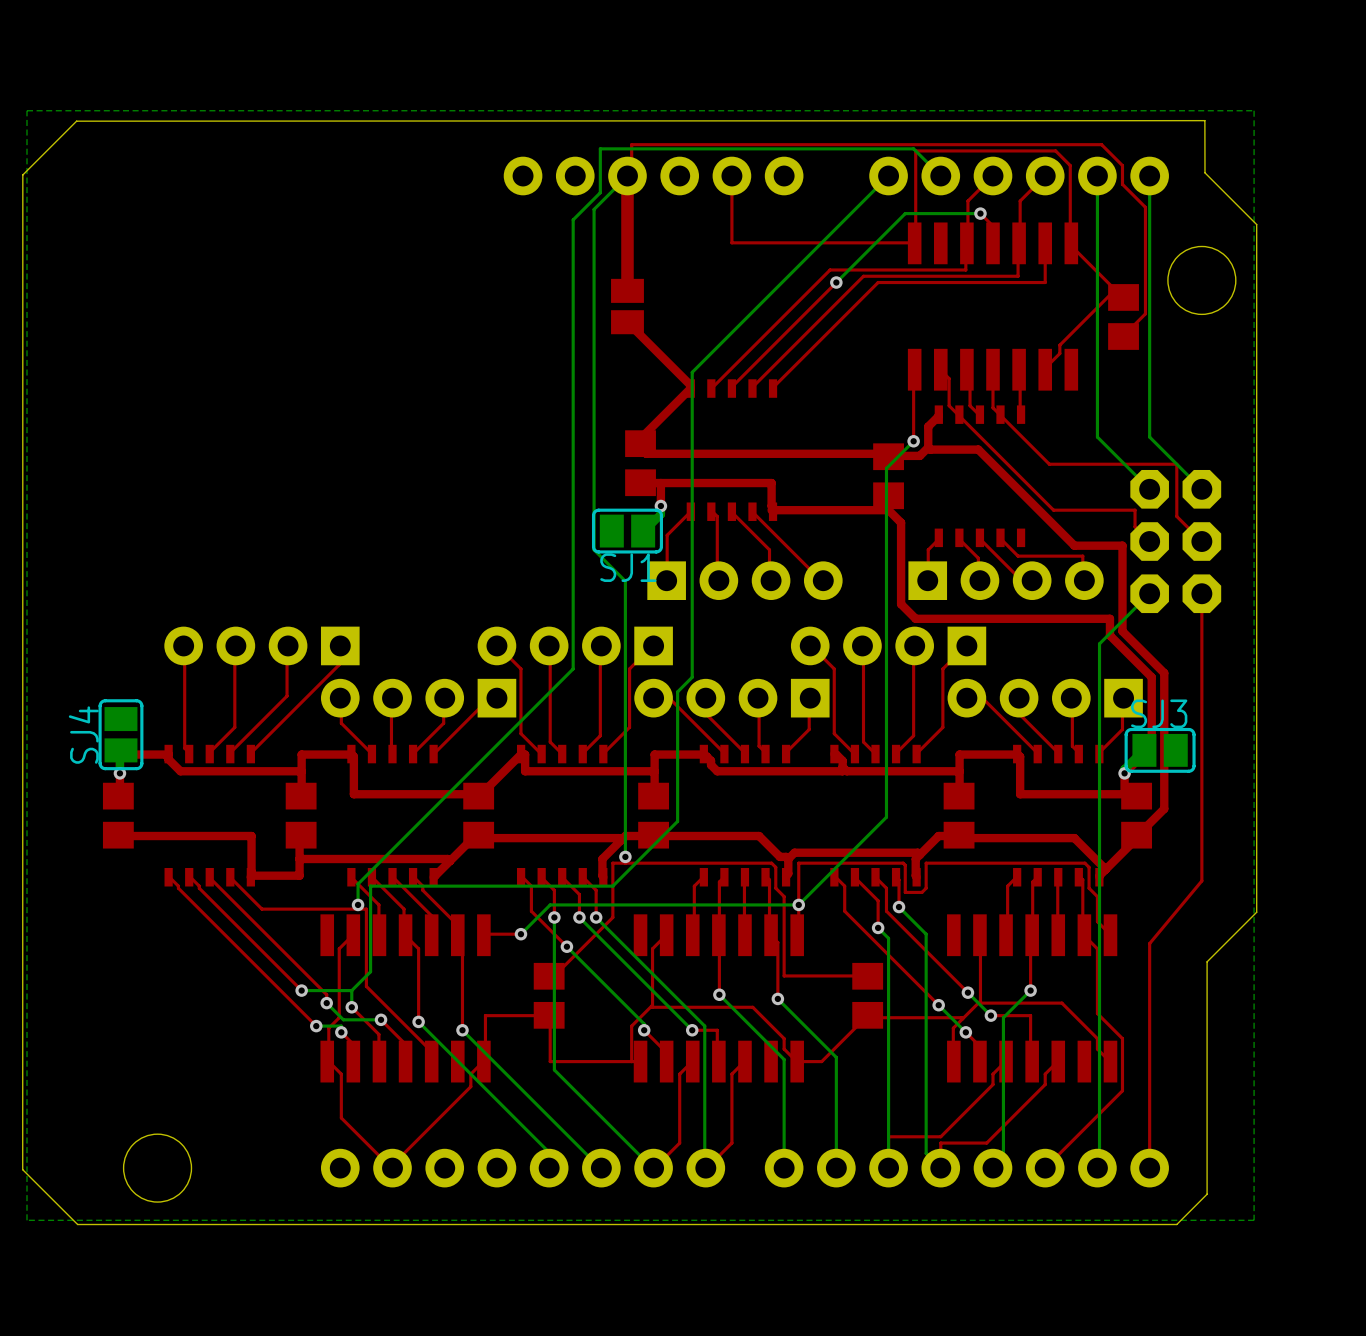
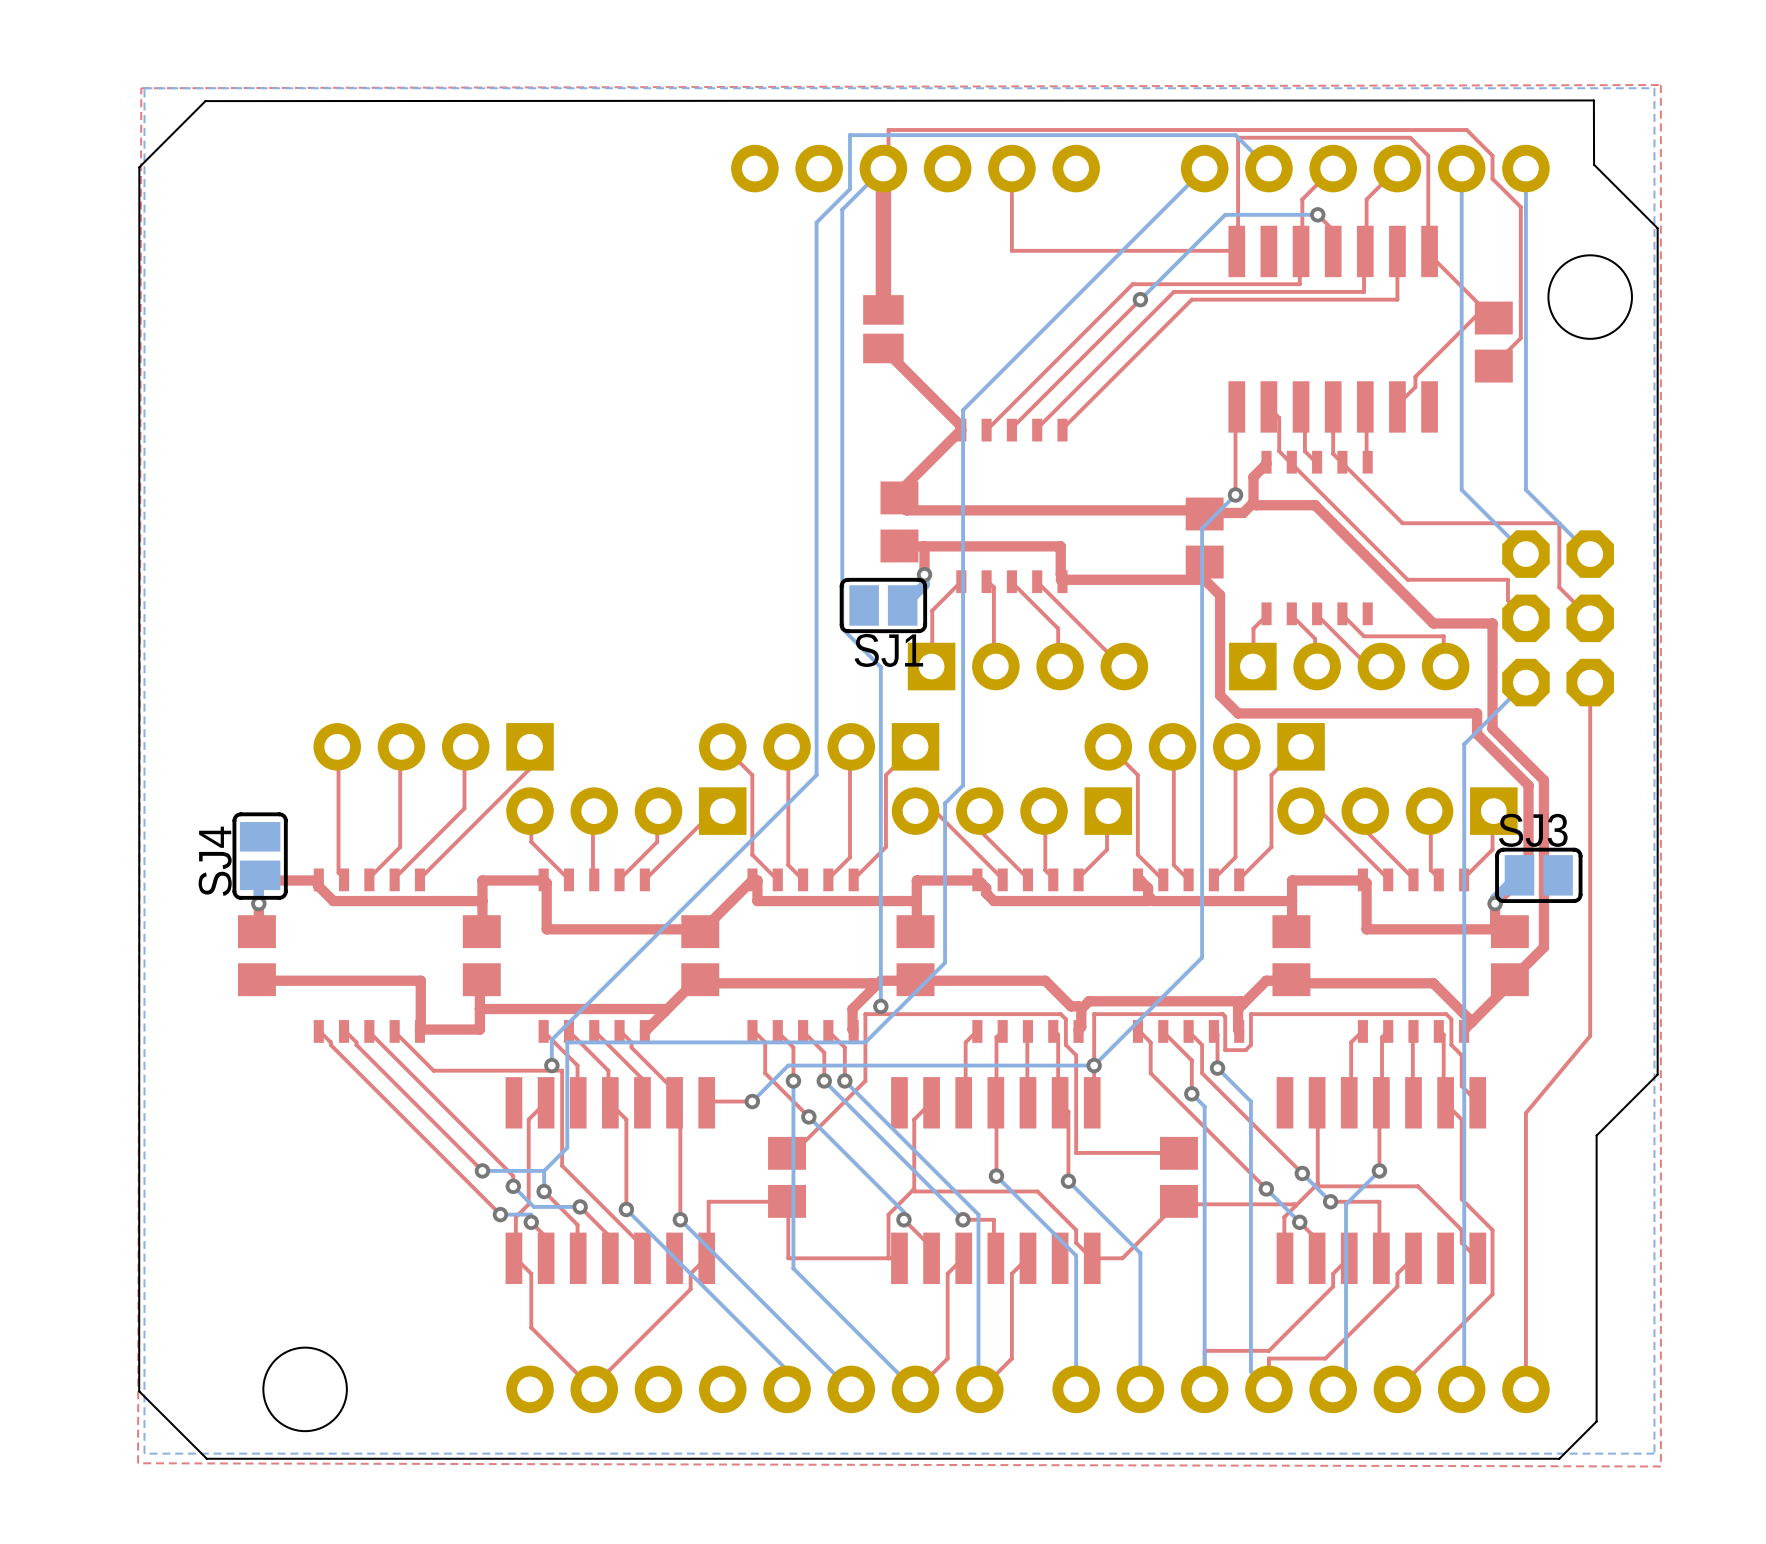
top zone outline: none -> (1660, 85) (1660, 1466) (138, 1463) (141, 88) (1660, 85)

